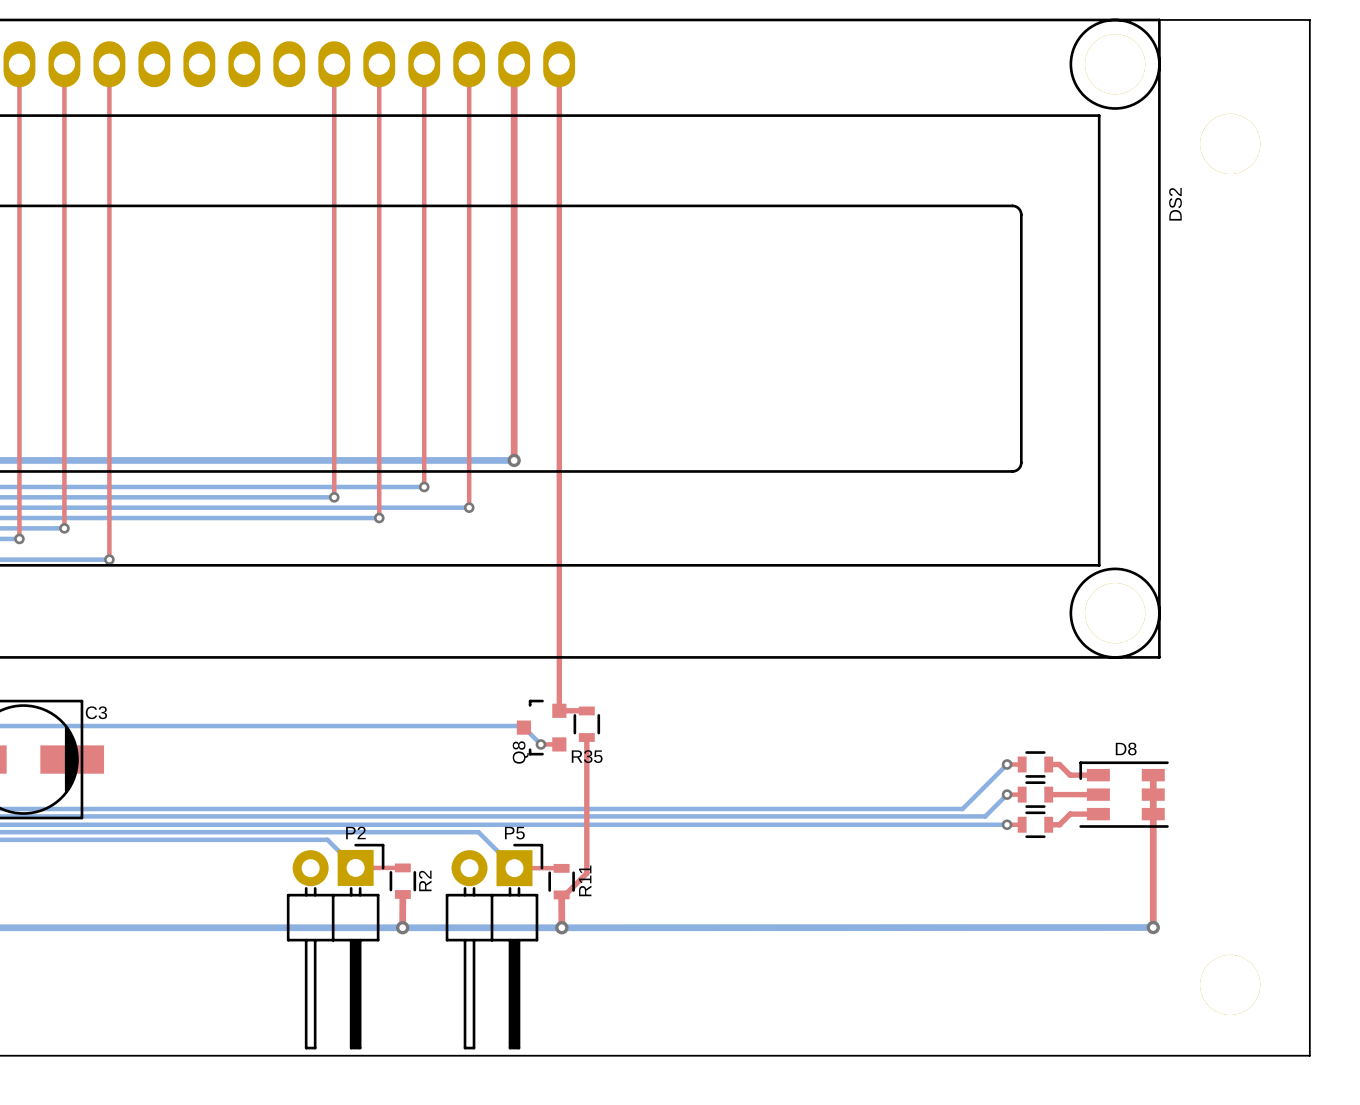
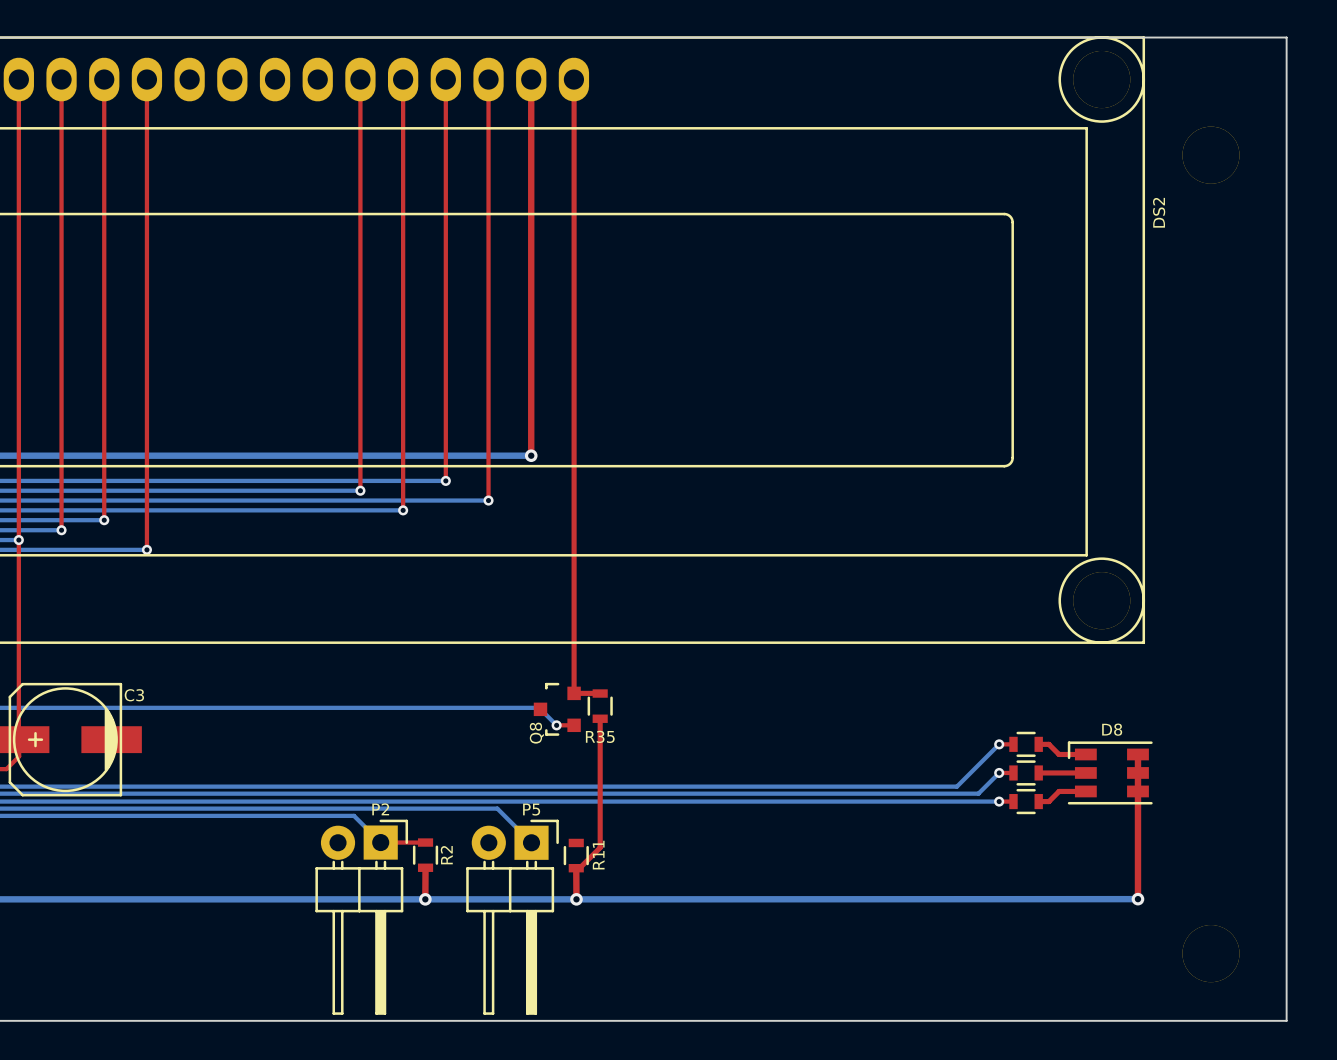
top track: (514, 868) (561, 868) -> none

